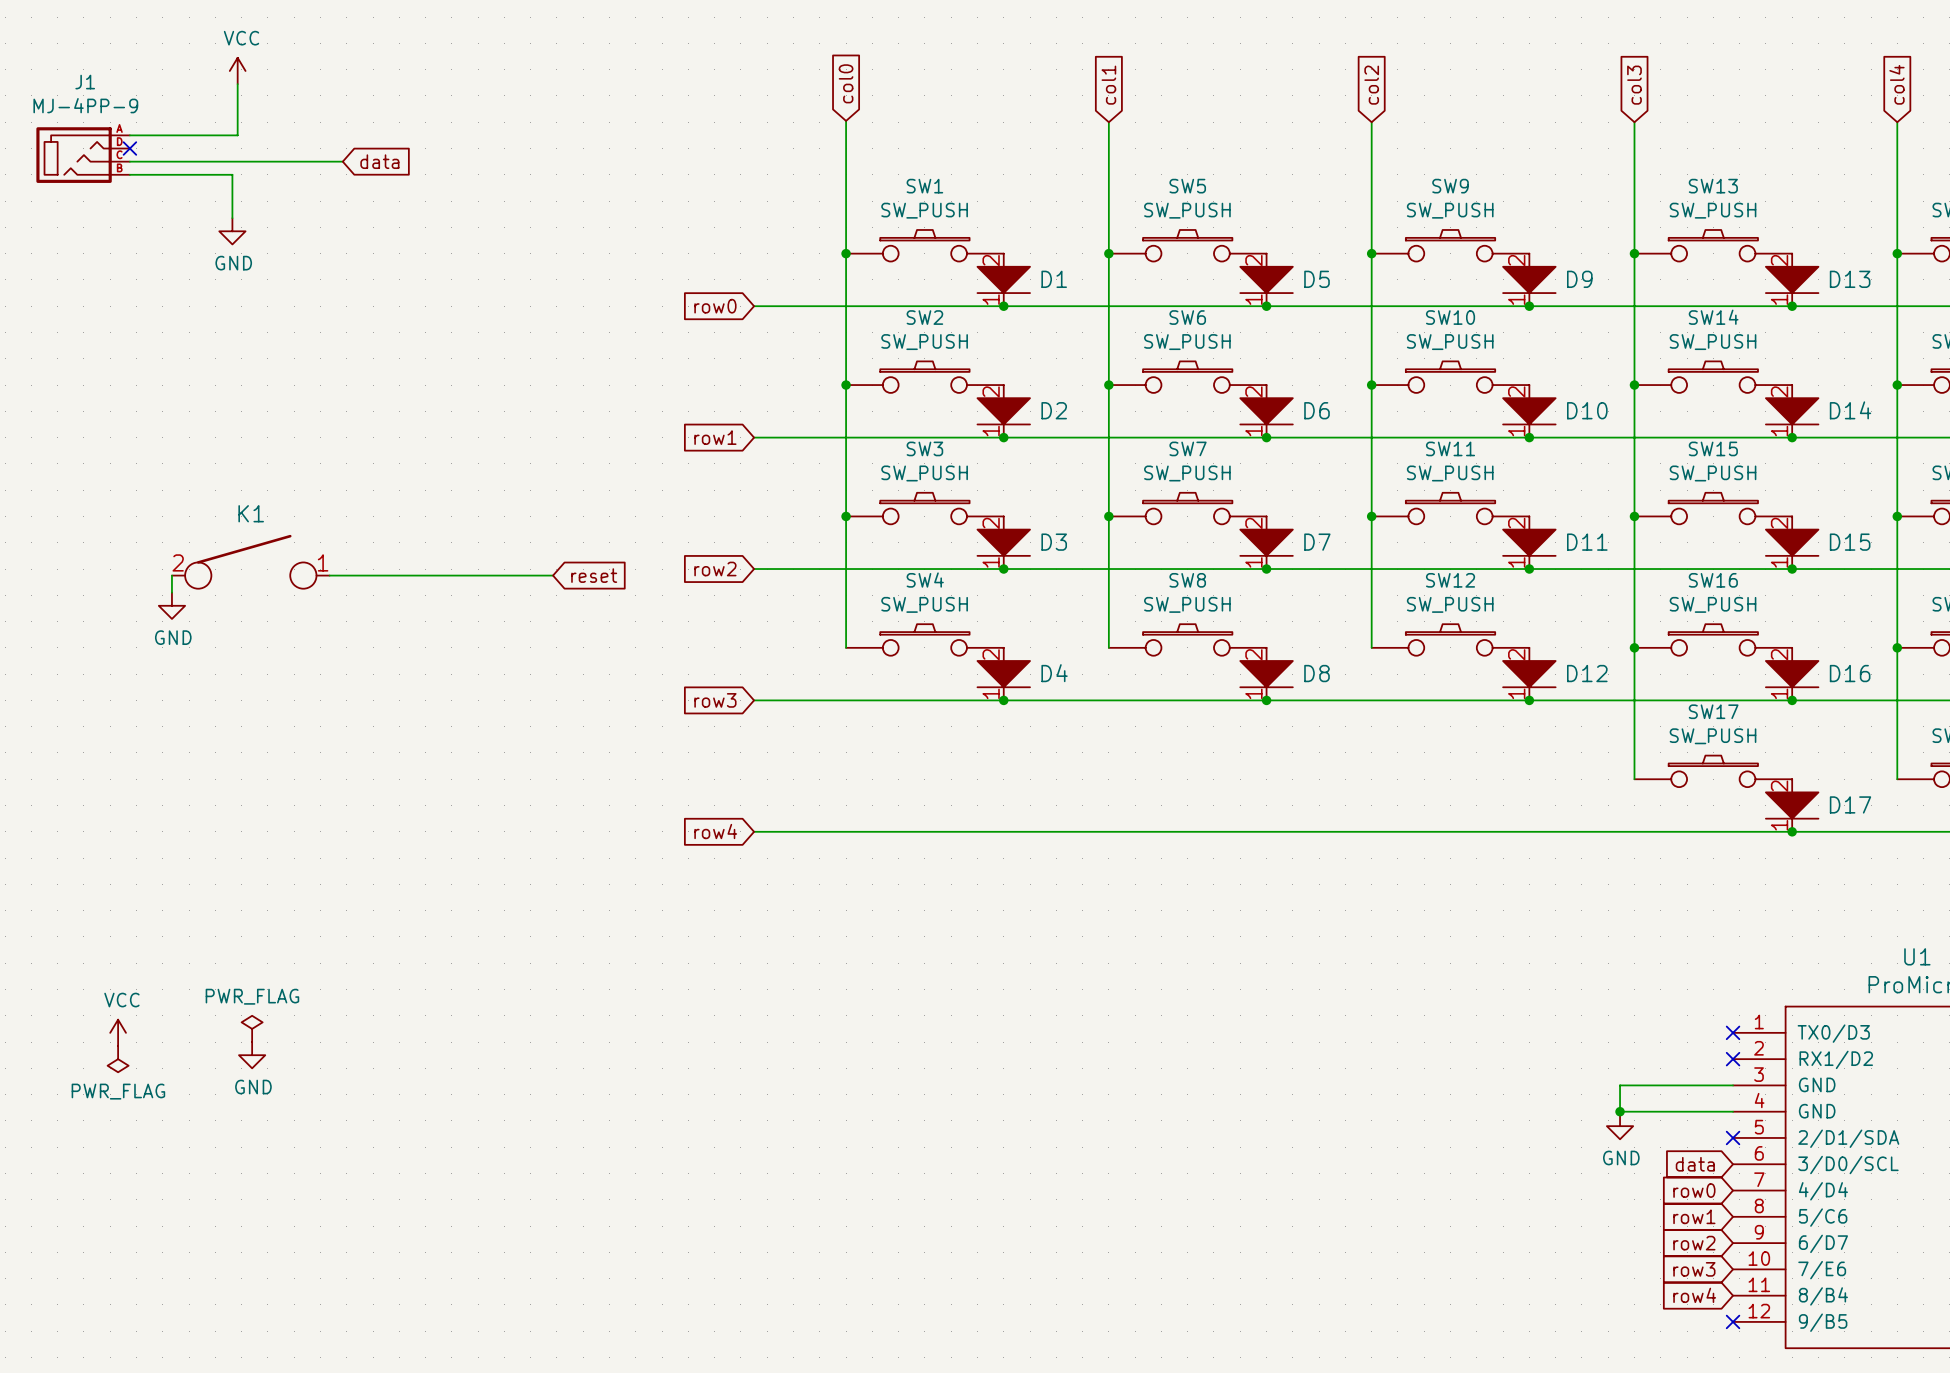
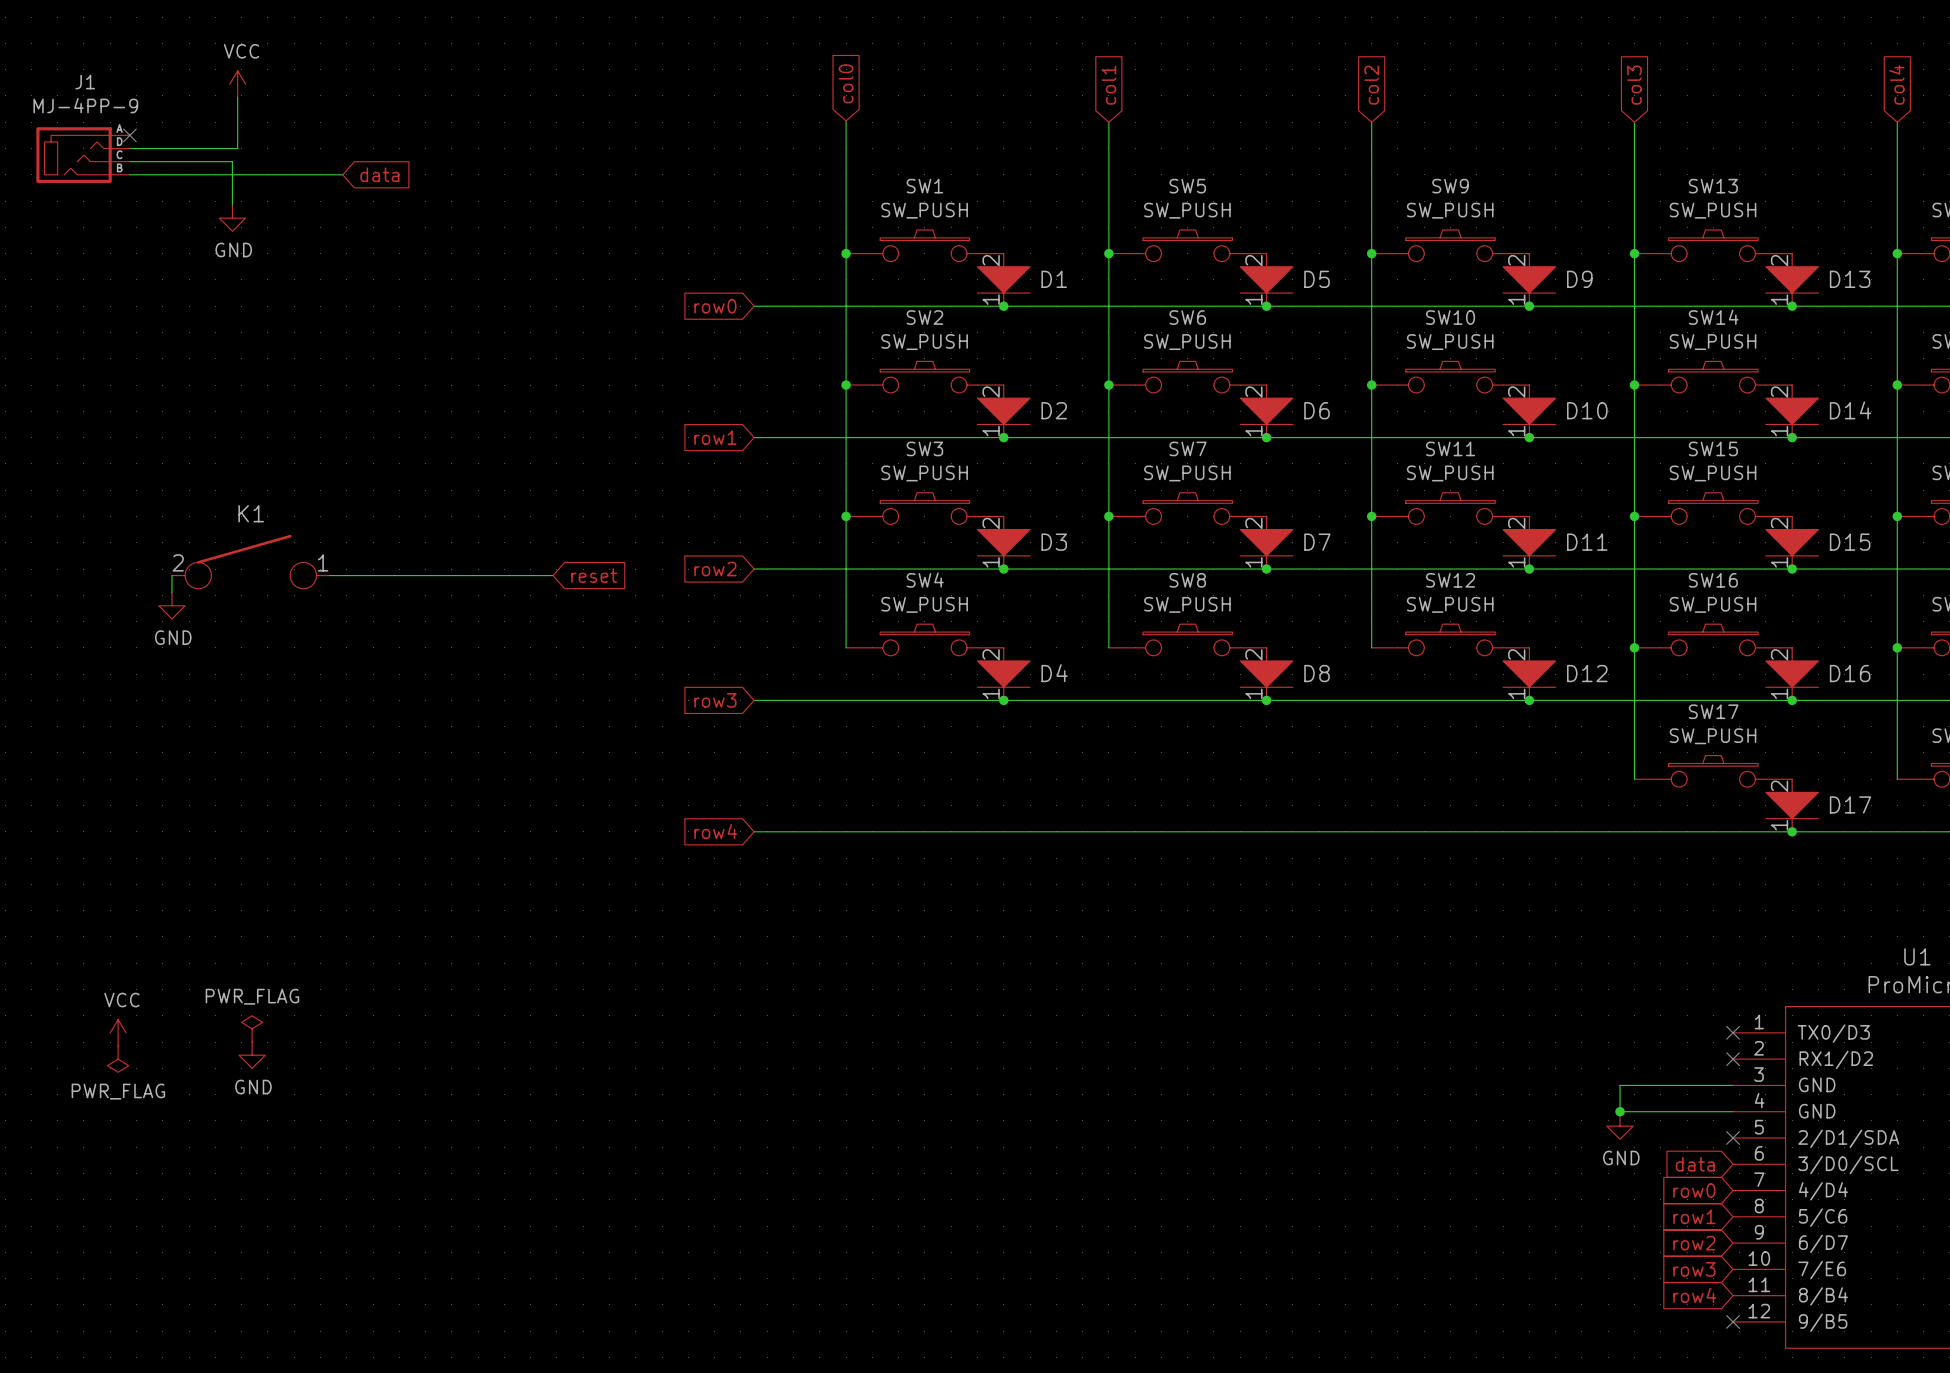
power symbol position: VCC (237, 70) -> VCC (237, 84)
wire: (129, 135) (237, 135) -> (129, 148) (237, 148) (237, 135)
no-connect mark position: (129, 148) -> (129, 135)
wire: (232, 161) (342, 161) -> (232, 161) (232, 174) (342, 174)
global label position: data (379, 161) -> data (379, 174)
power symbol position: GND (232, 231) -> GND (232, 218)

